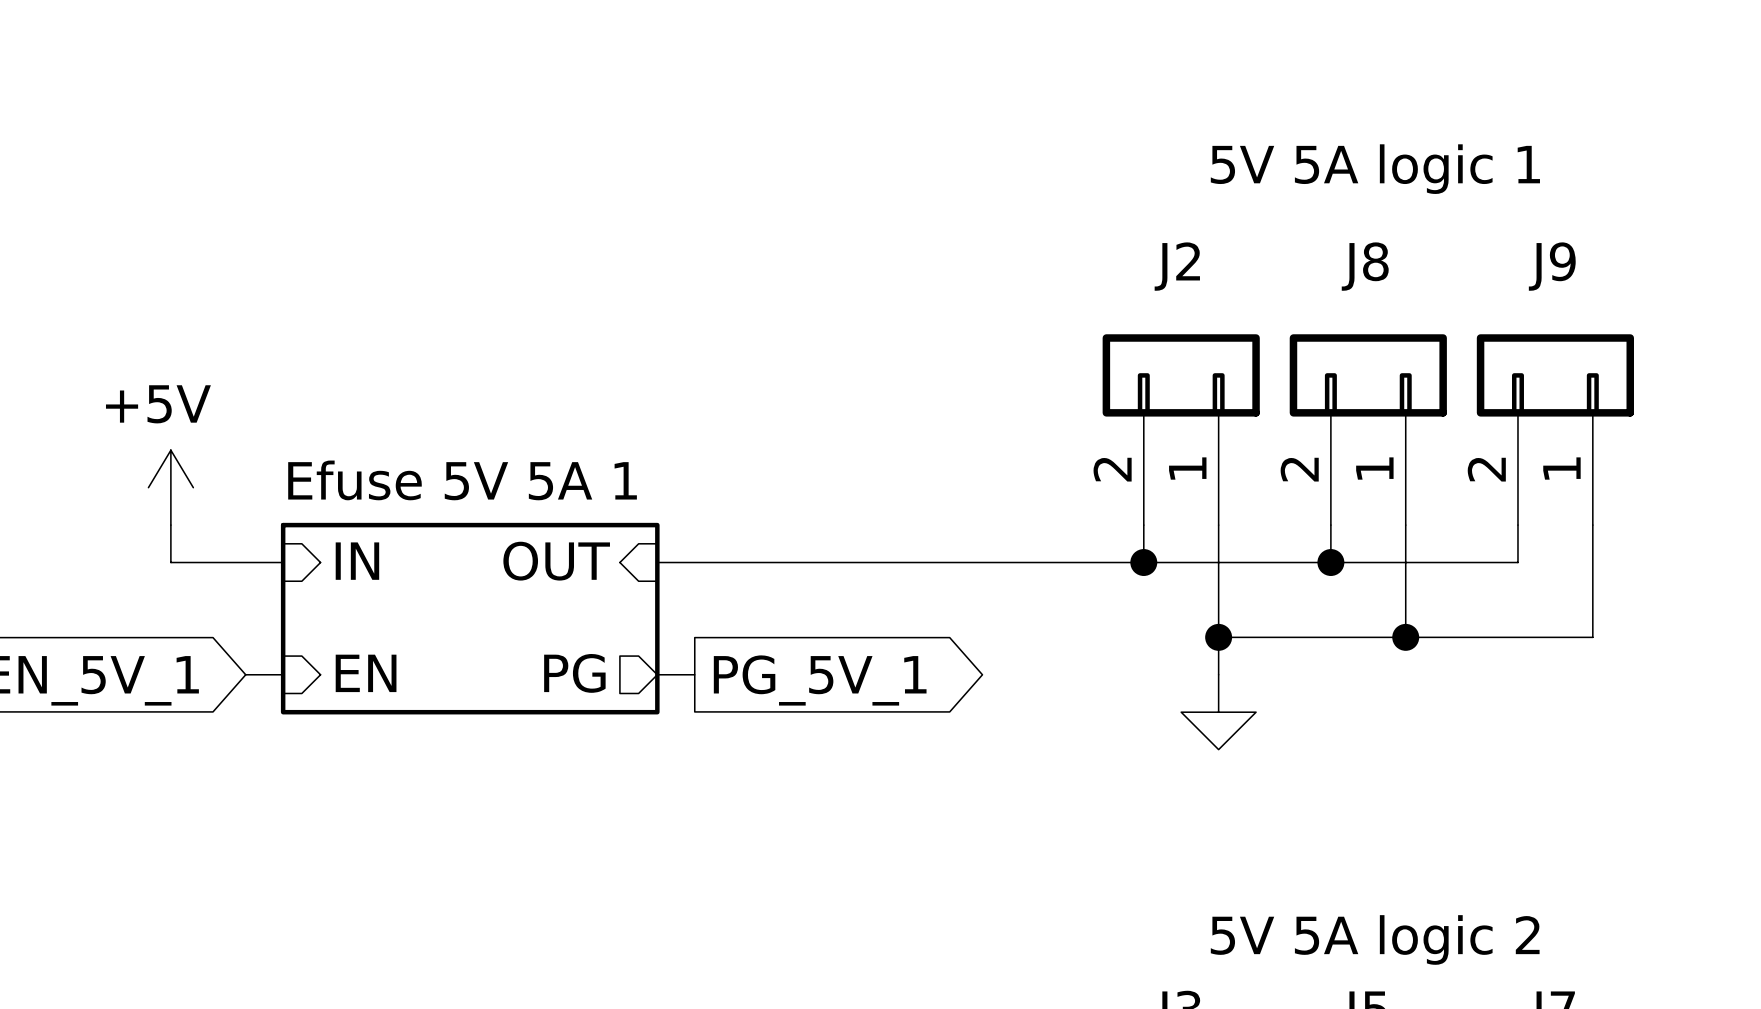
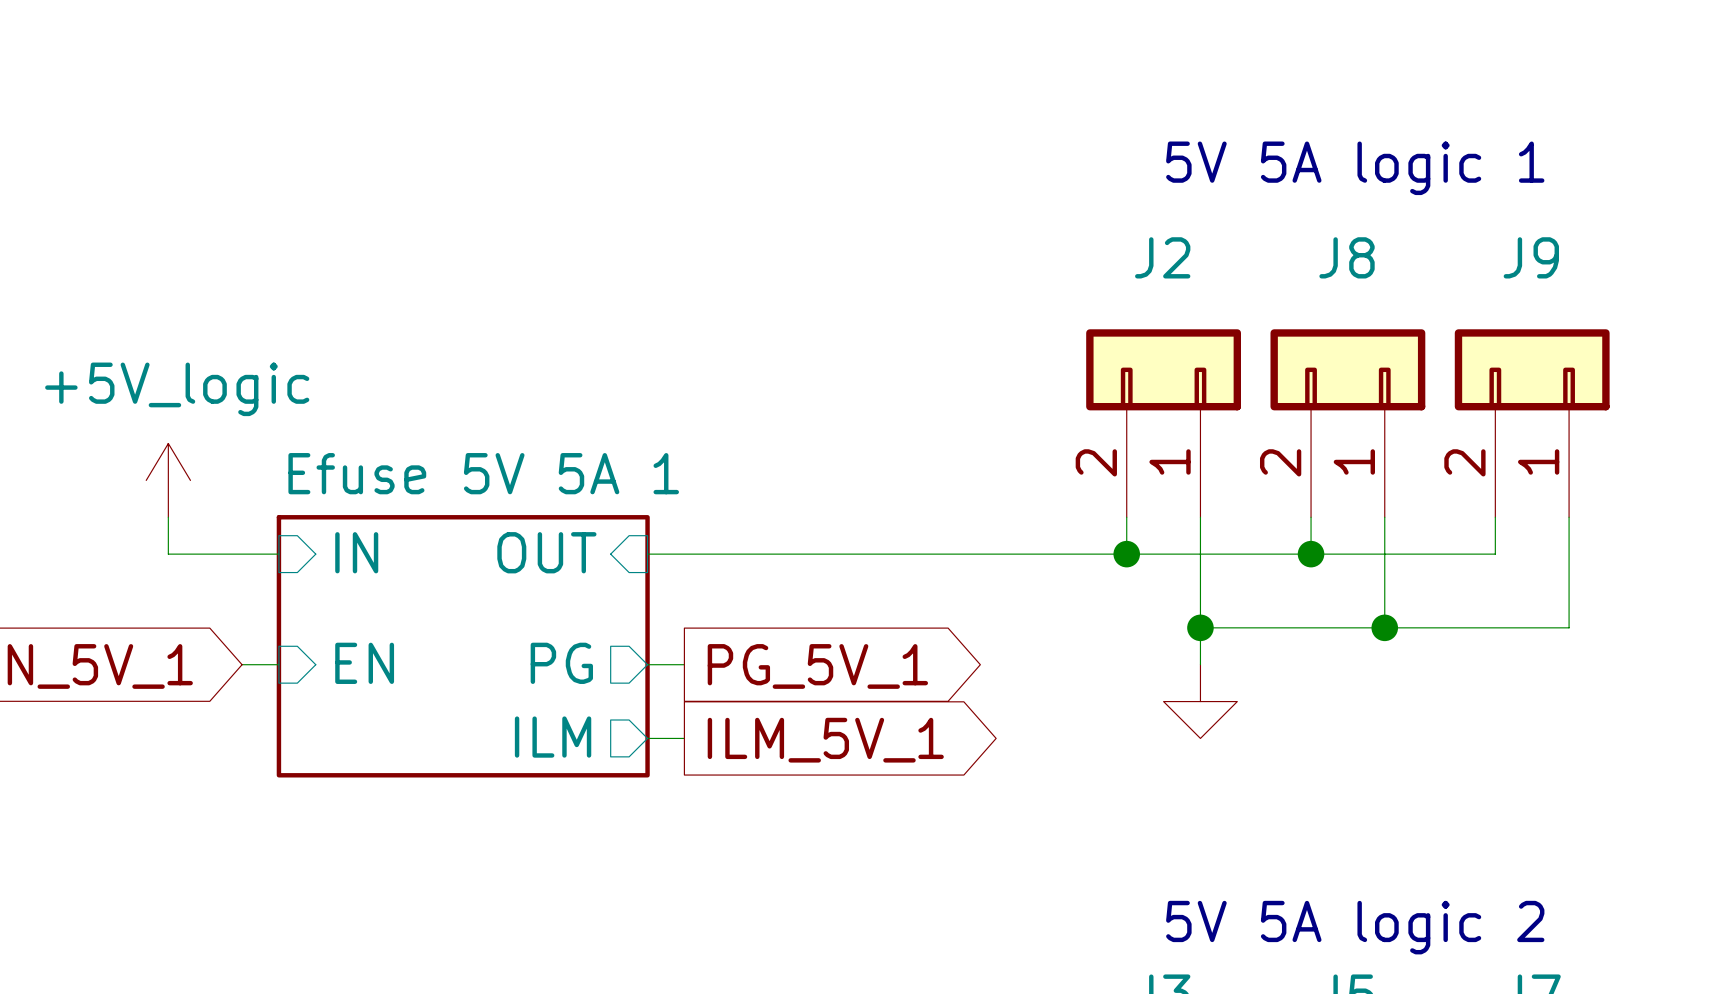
power symbol: +5V (170, 487) -> +5V_logic (168, 480)
sheet Efuse 5V 5A 1 shape: [280, 522, 660, 715] -> [276, 515, 650, 778]
sheet pin: none -> ILM (553, 737)
wire: none -> (647, 738) (684, 738)
global label: none -> ILM_5V_1 (825, 740)

